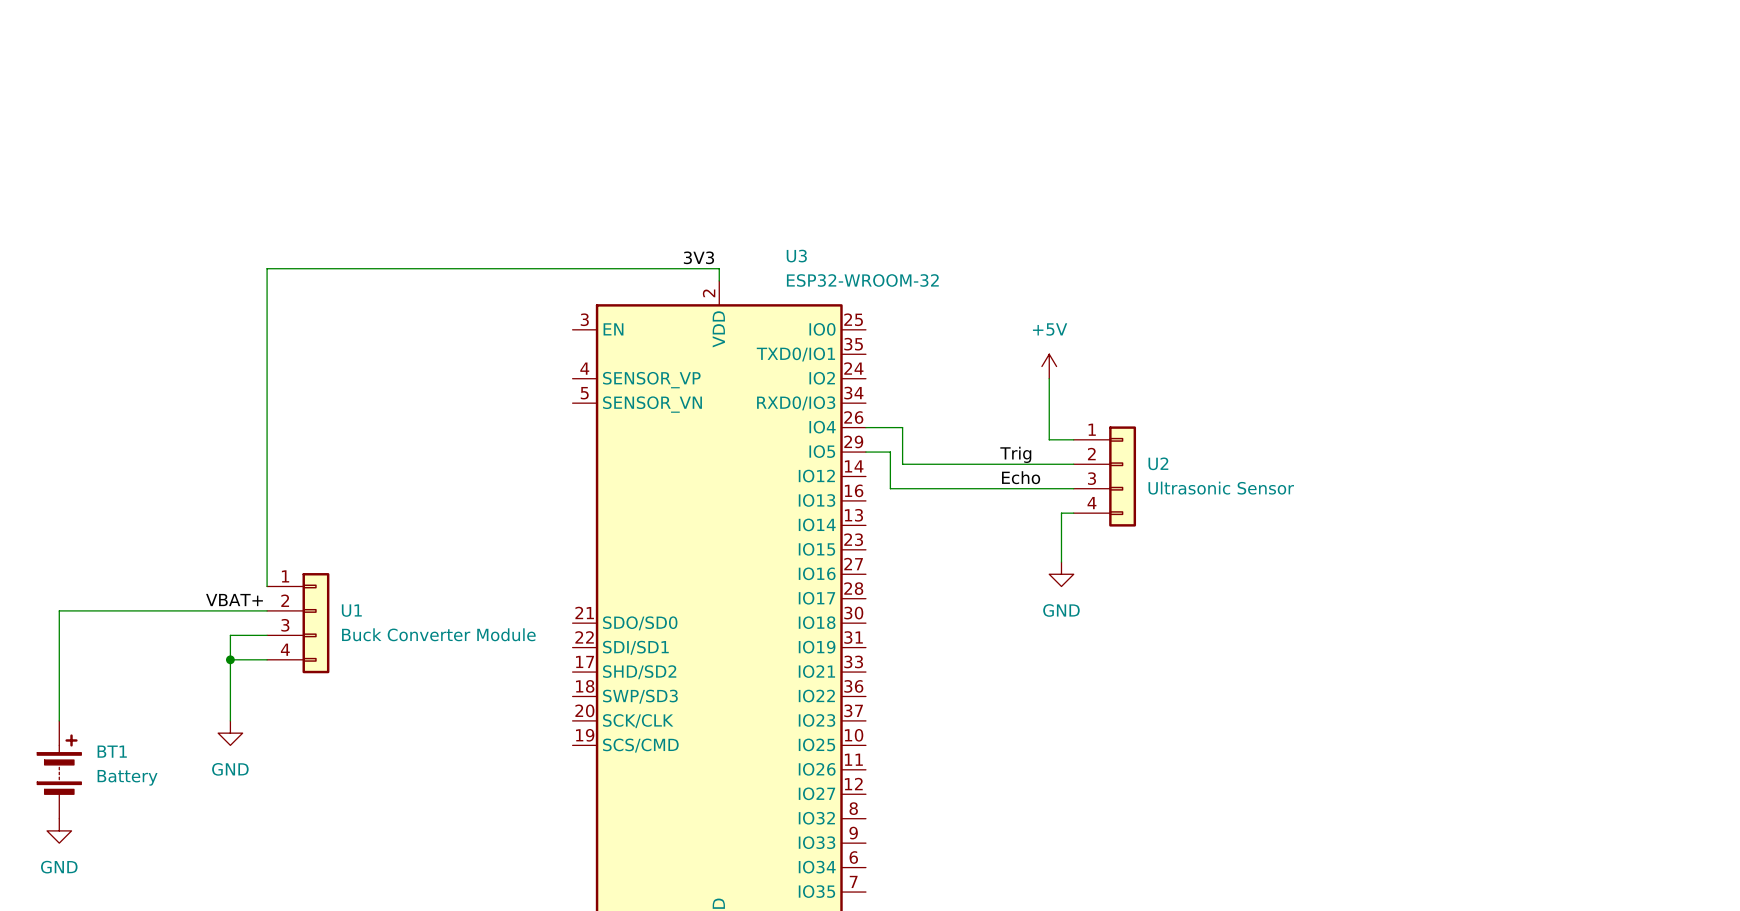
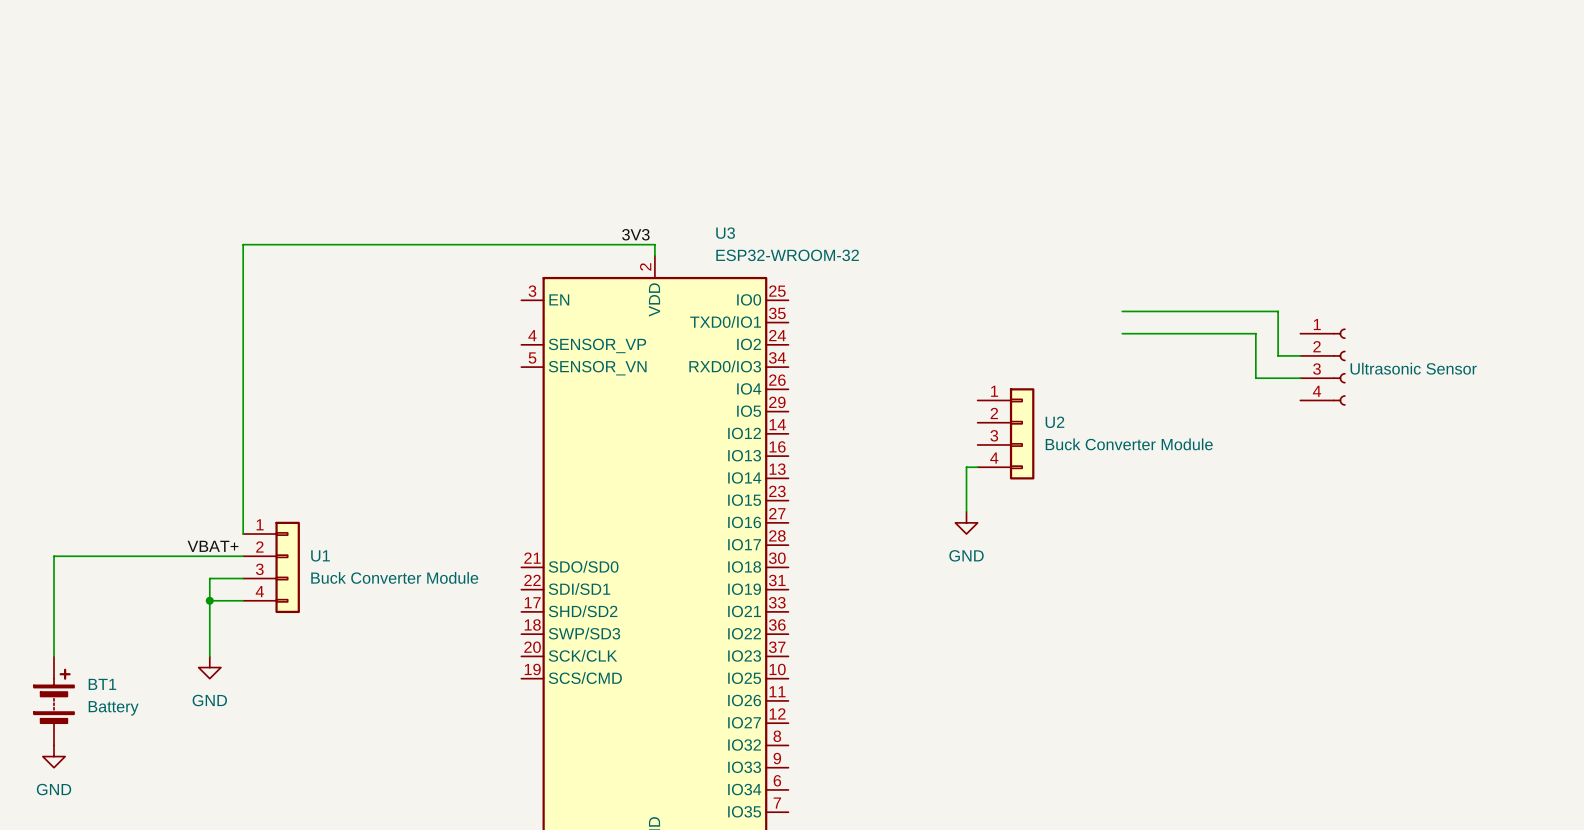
wire: none -> (1122, 311) (1278, 311) (1278, 355) (1300, 355)
power symbol: +5V (1049, 366) -> none
wire: none -> (1122, 333) (1255, 333) (1255, 378) (1300, 378)
wire: (1049, 378) (1049, 439) (1073, 439) -> none
part: none -> Ultrasonic Sensor (1322, 367)
wire: (865, 427) (902, 427) (902, 464) (1073, 464) -> none
wire: (865, 452) (890, 452) (890, 488) (1073, 488) -> none
label: Trig (1015, 454) -> none
label: Echo (1021, 477) -> none
U2 value: Ultrasonic Sensor (1221, 488) -> Buck Converter Module (1129, 444)

